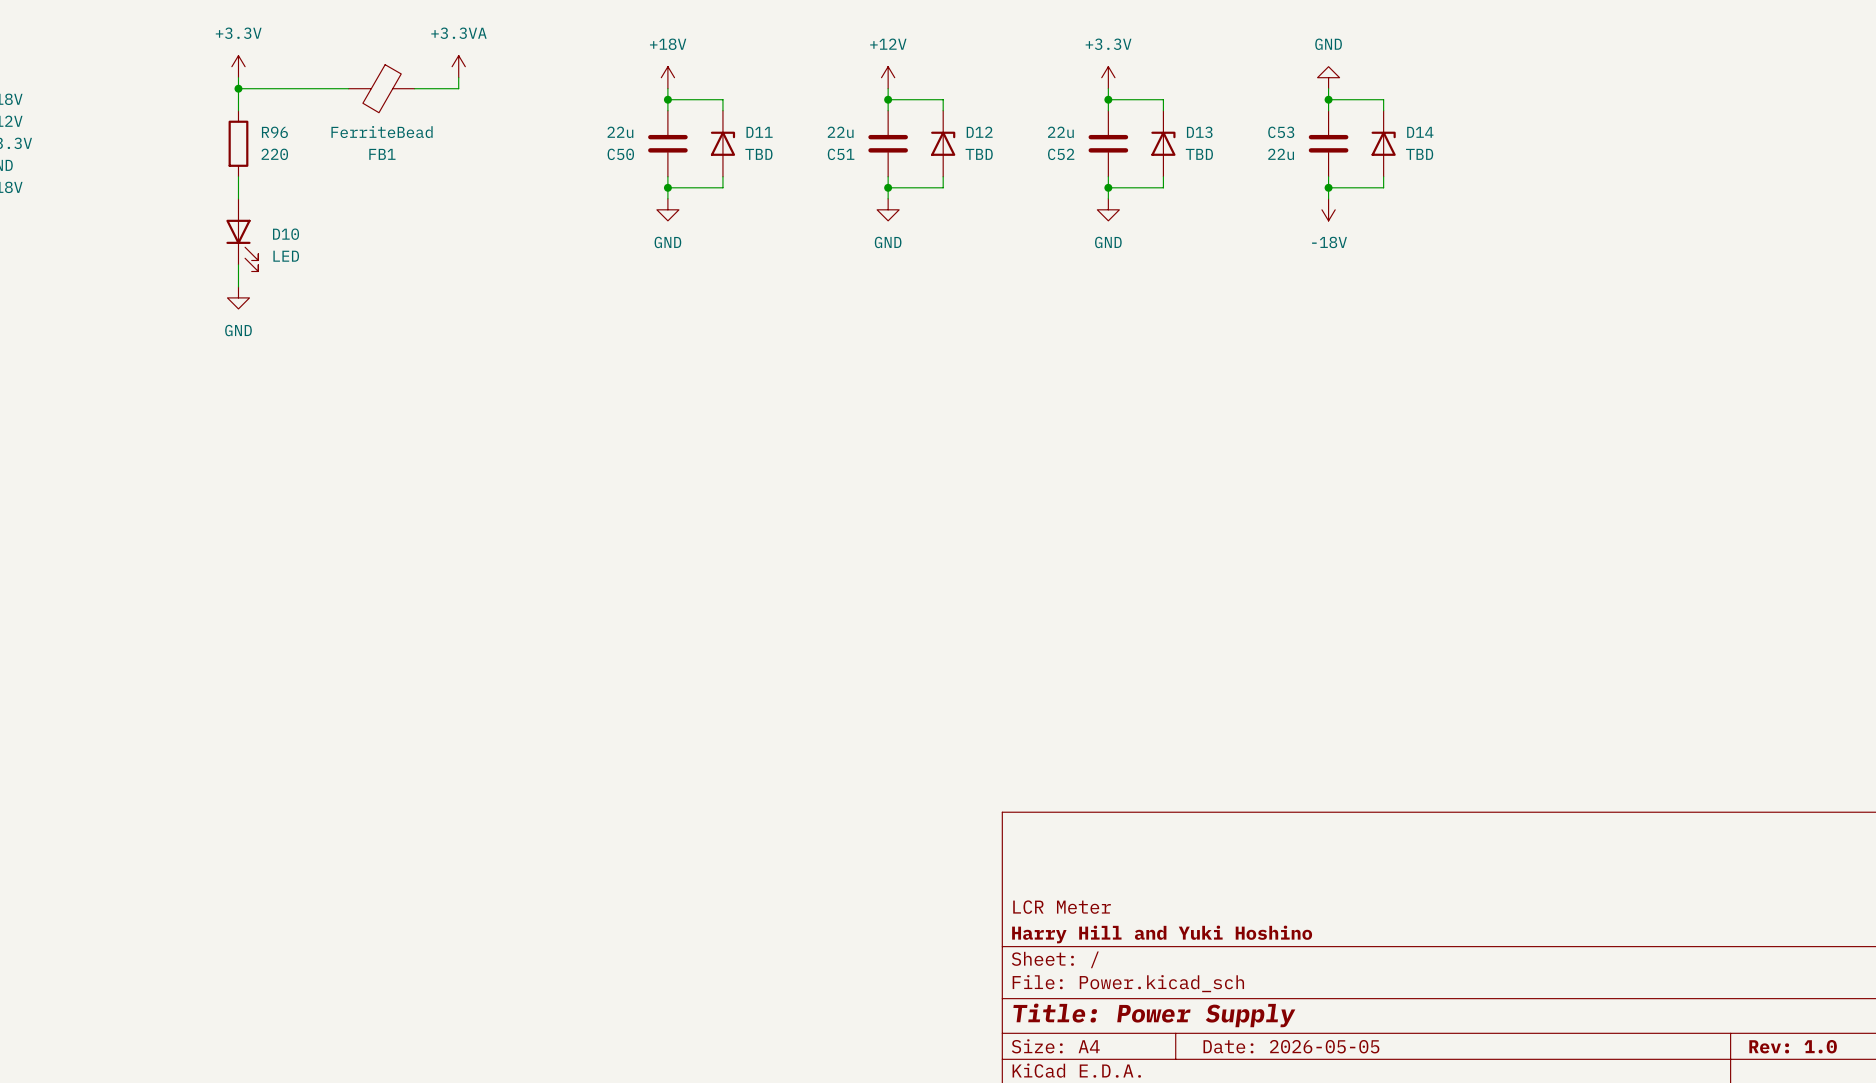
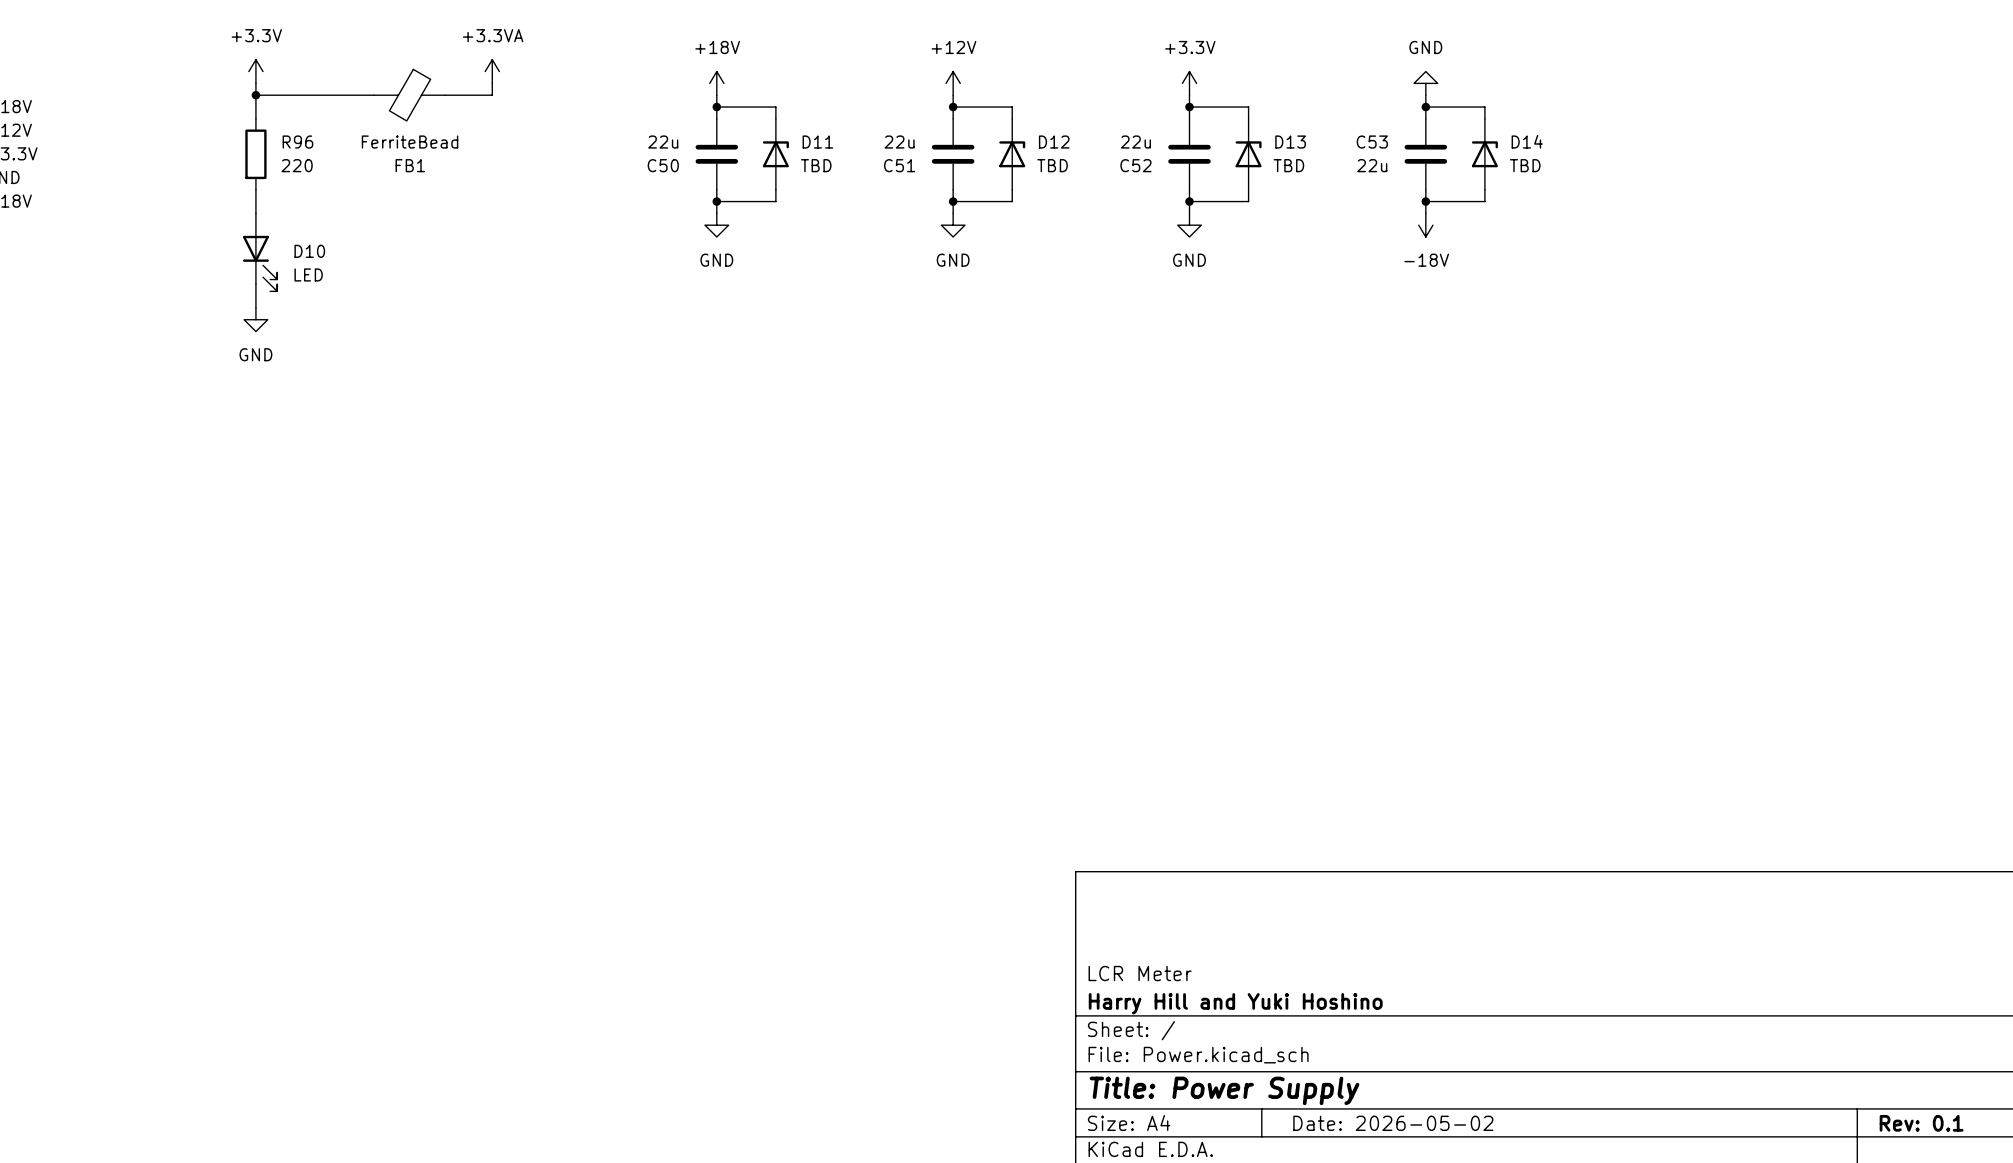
title block: Date: 2026-05-05 (1291, 1046) -> Date: 2026-05-02 (1393, 1123)
title block: Rev: 1.0 (1793, 1046) -> Rev: 0.1 (1921, 1123)

